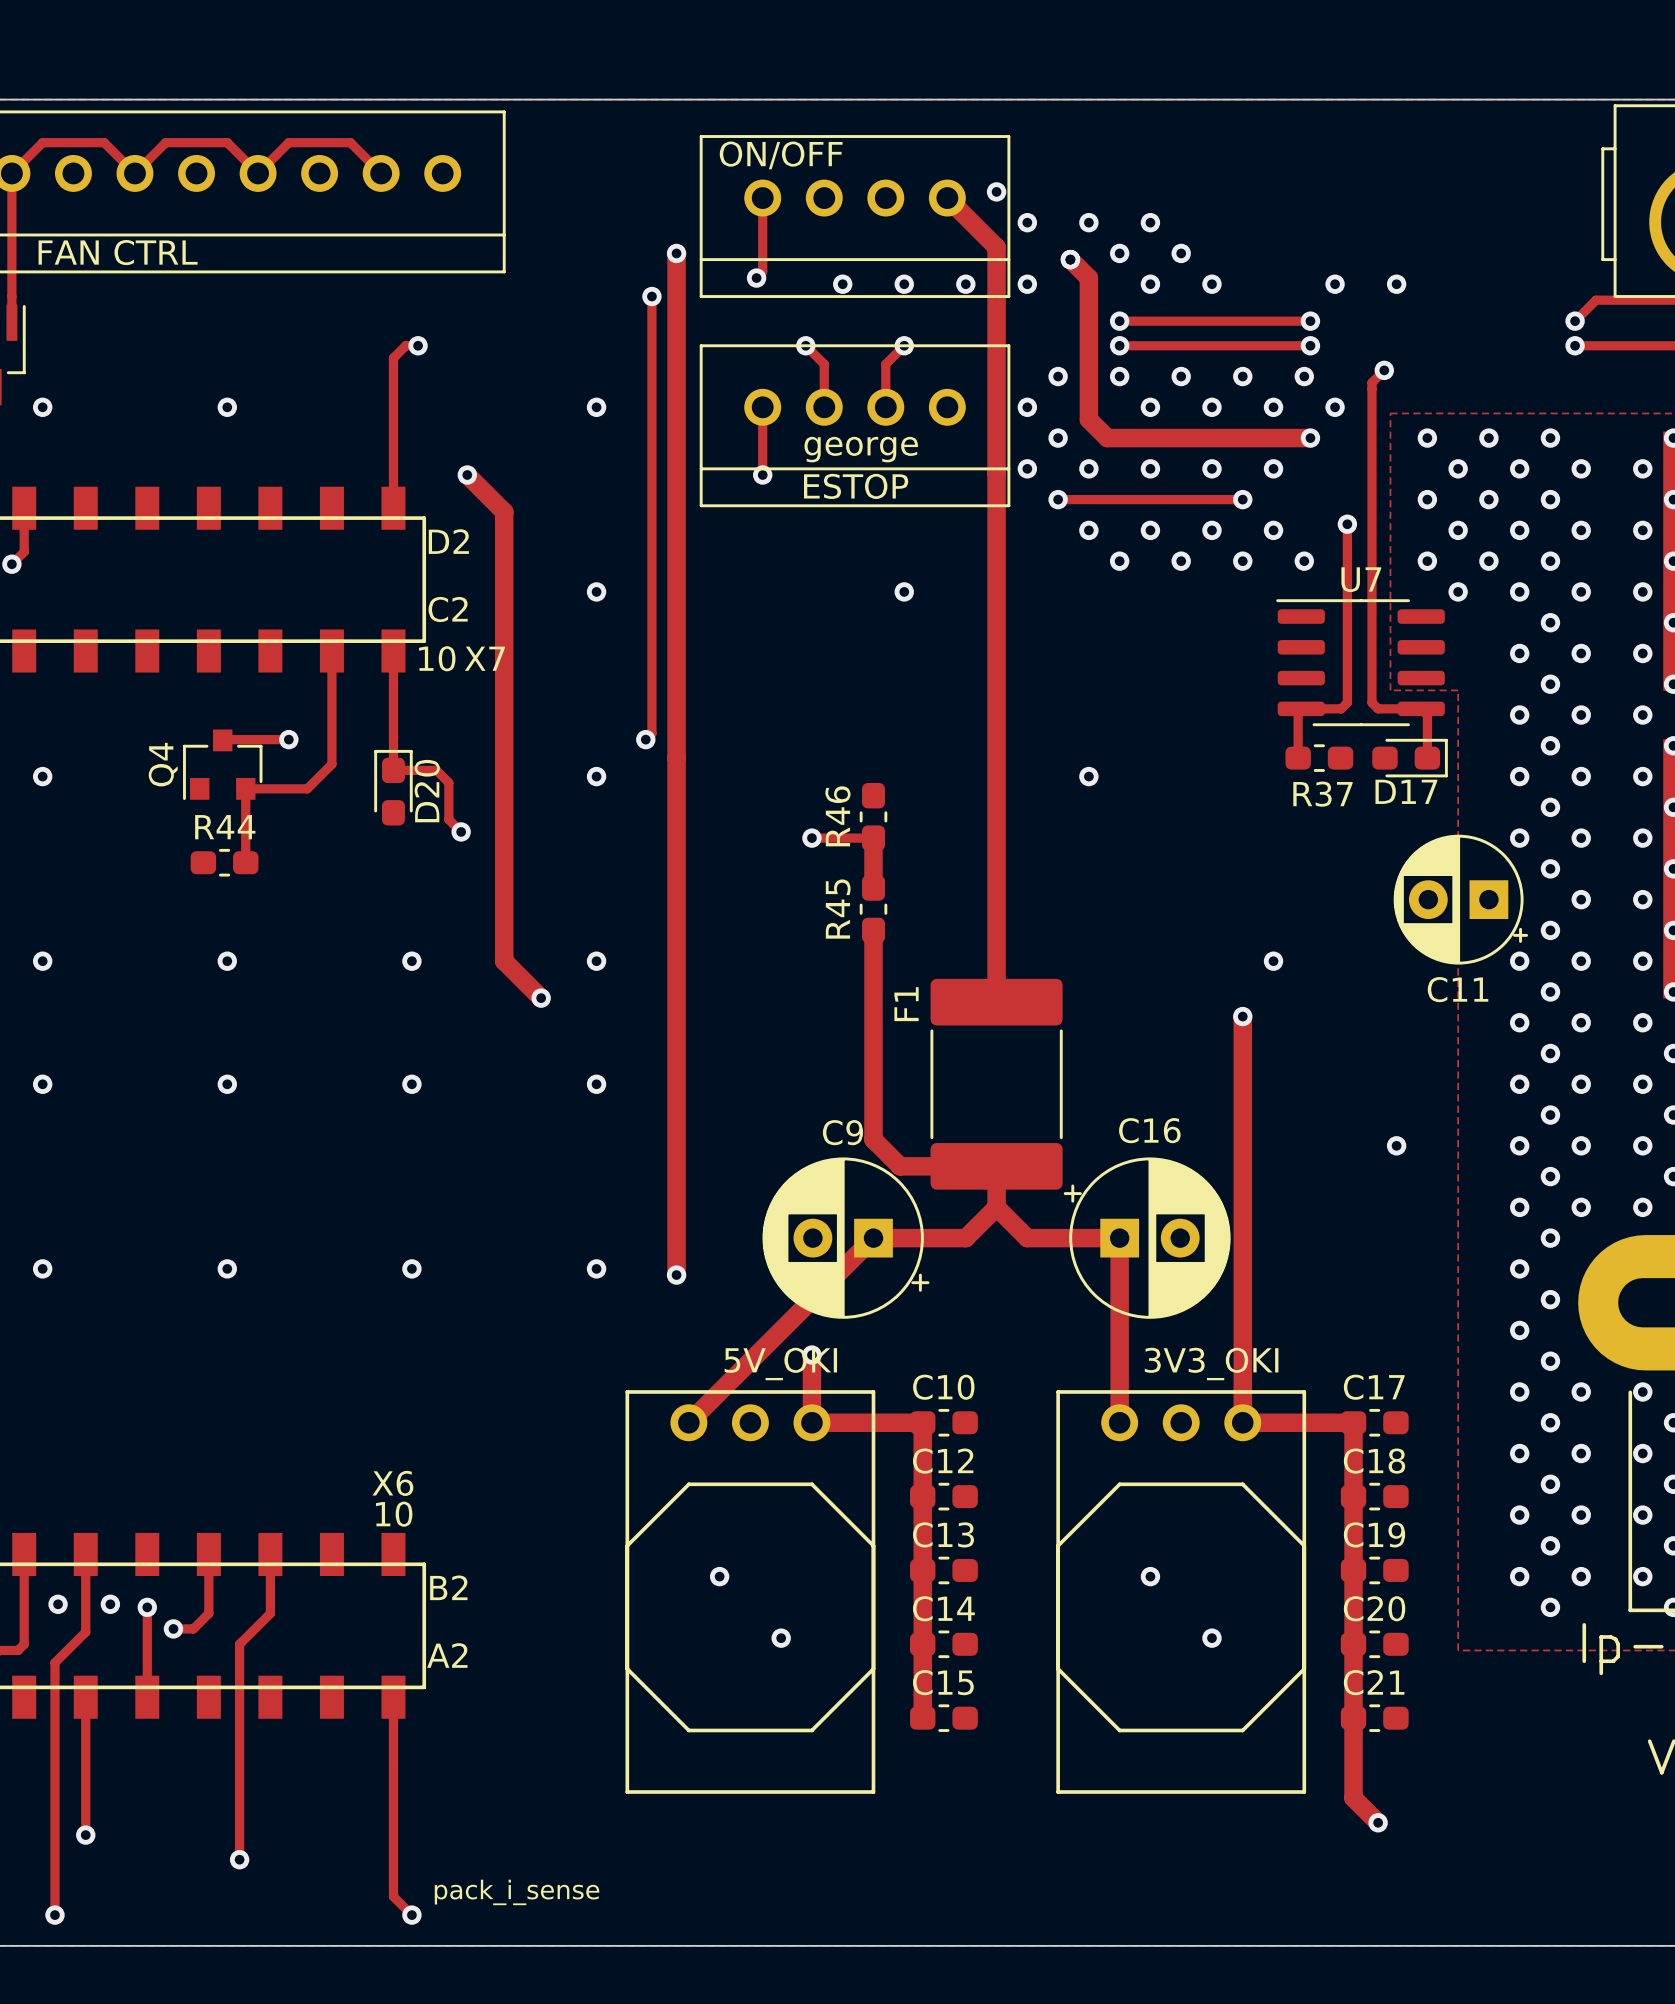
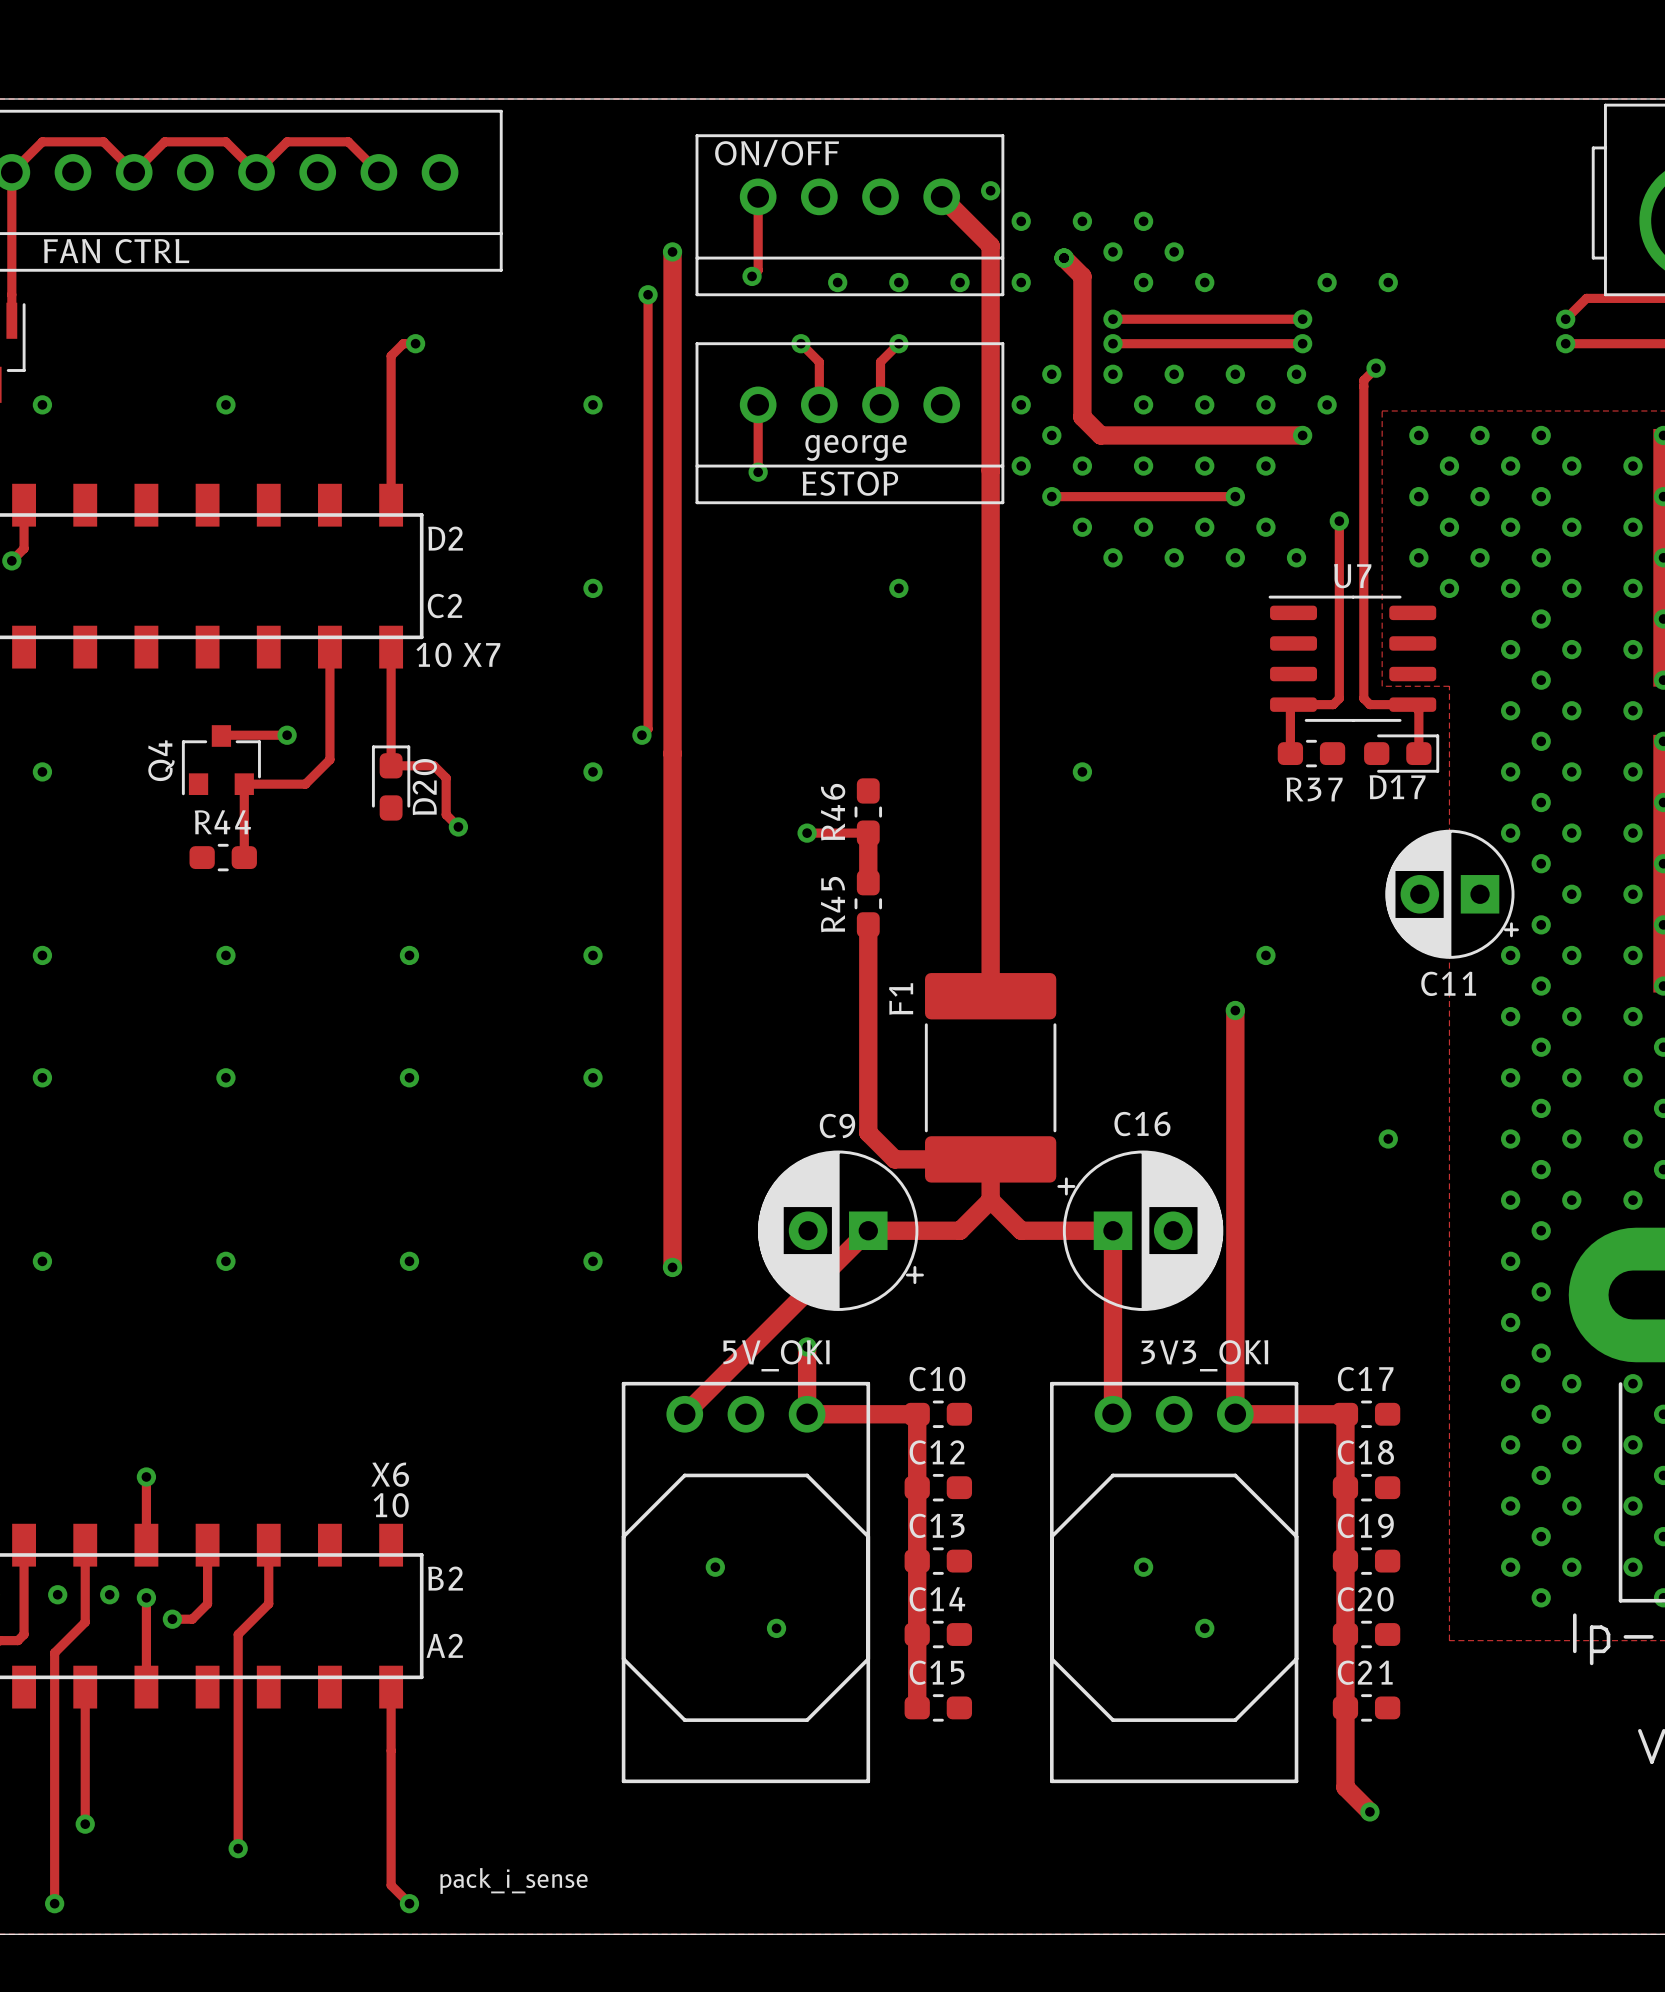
track: (467, 475) (504, 511) (504, 961) (541, 998) -> none
via: (467, 475) -> none
via: (541, 998) -> none
track: none -> (146, 1476) (146, 1536)
via: none -> (146, 1476)

